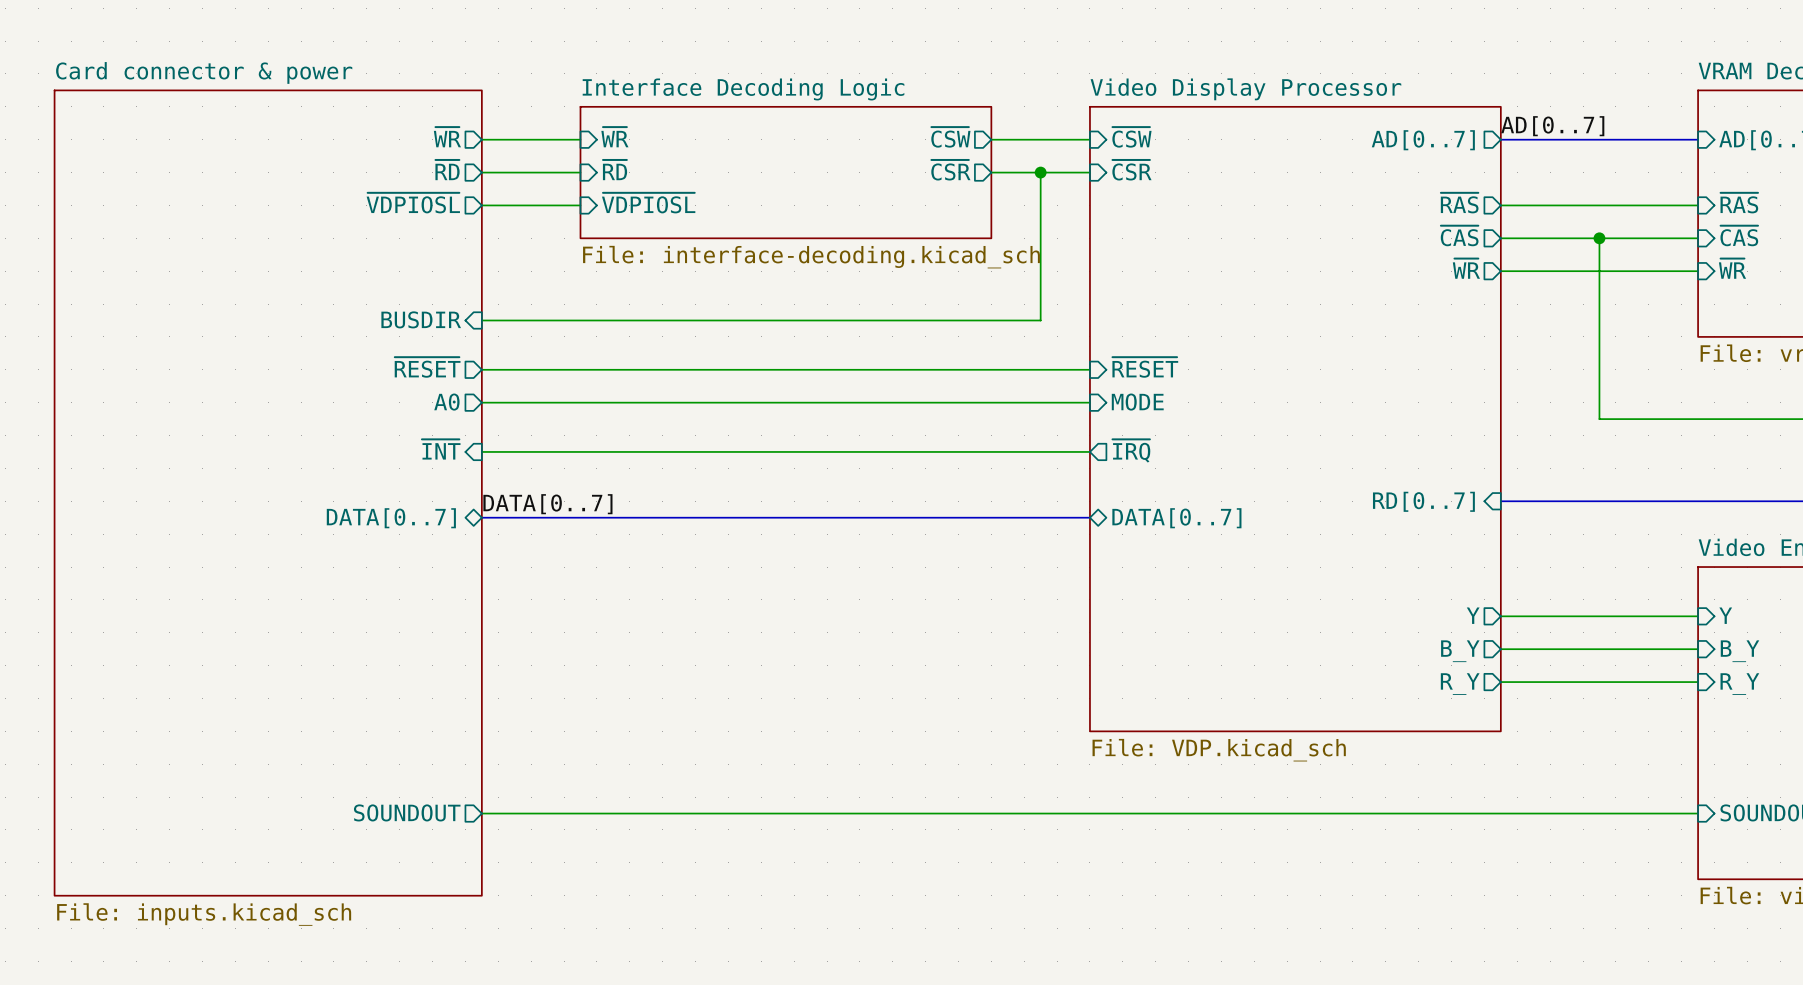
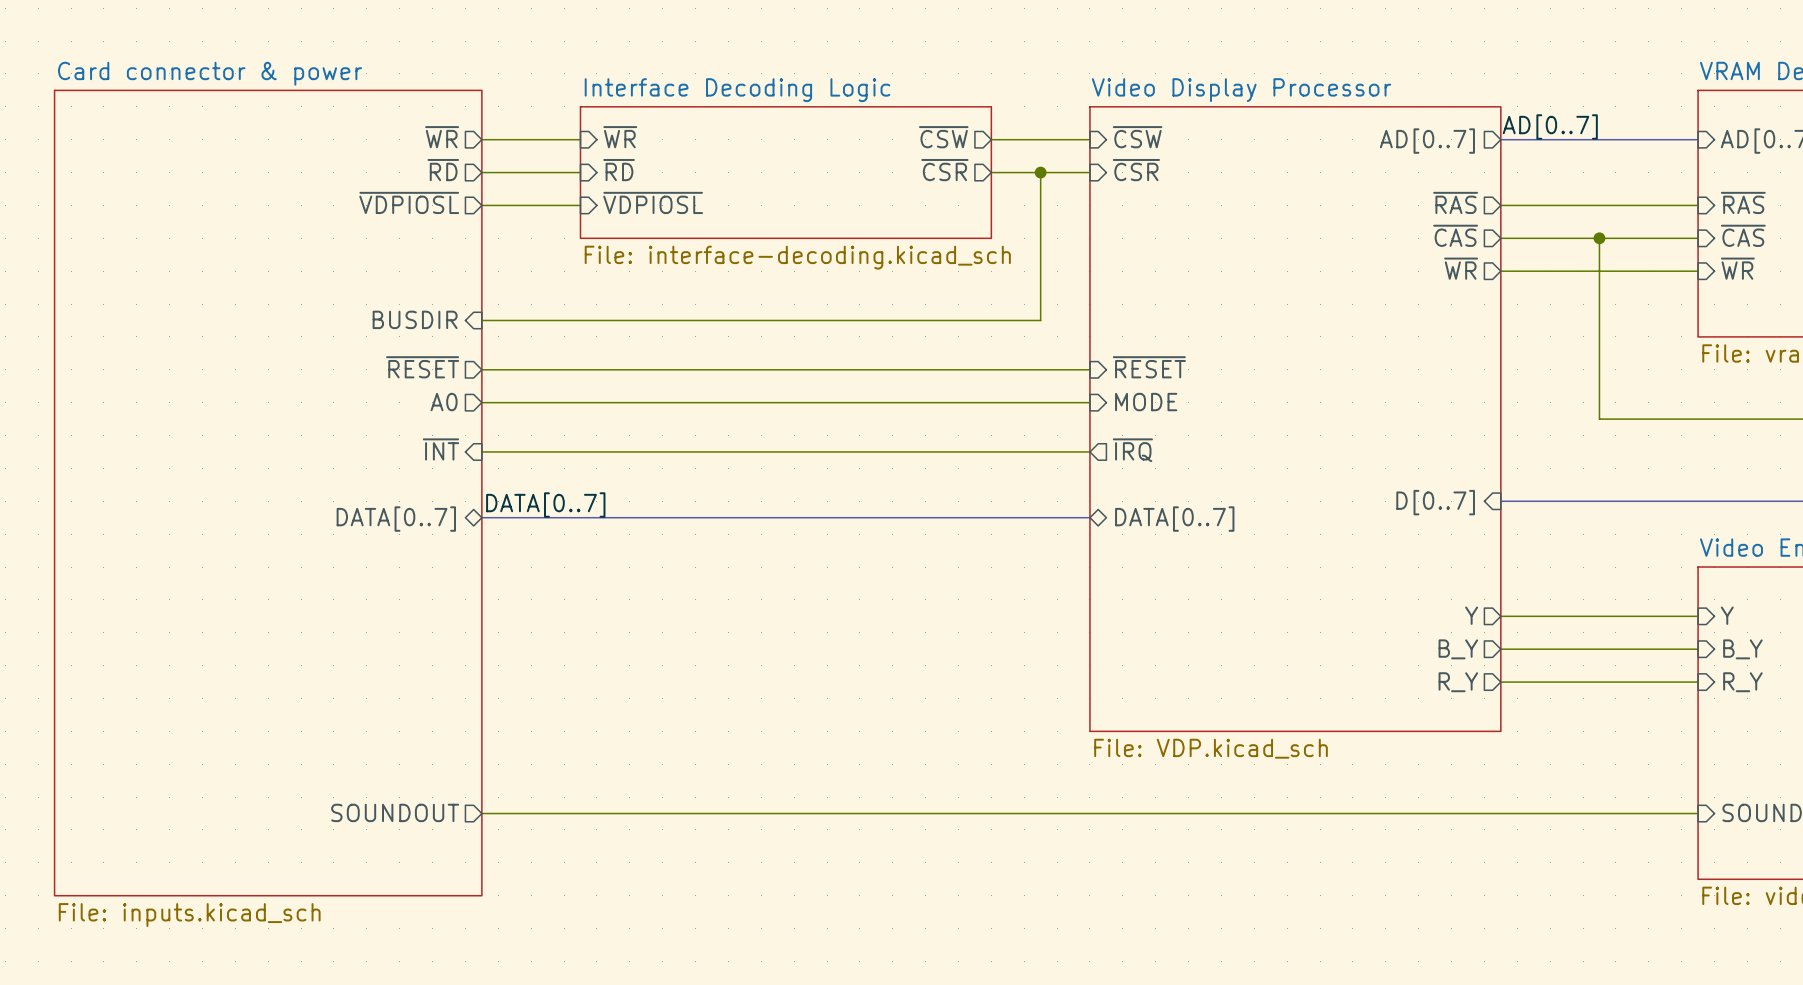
sheet pin: RD[0..7] (1423, 501) -> D[0..7] (1435, 502)

